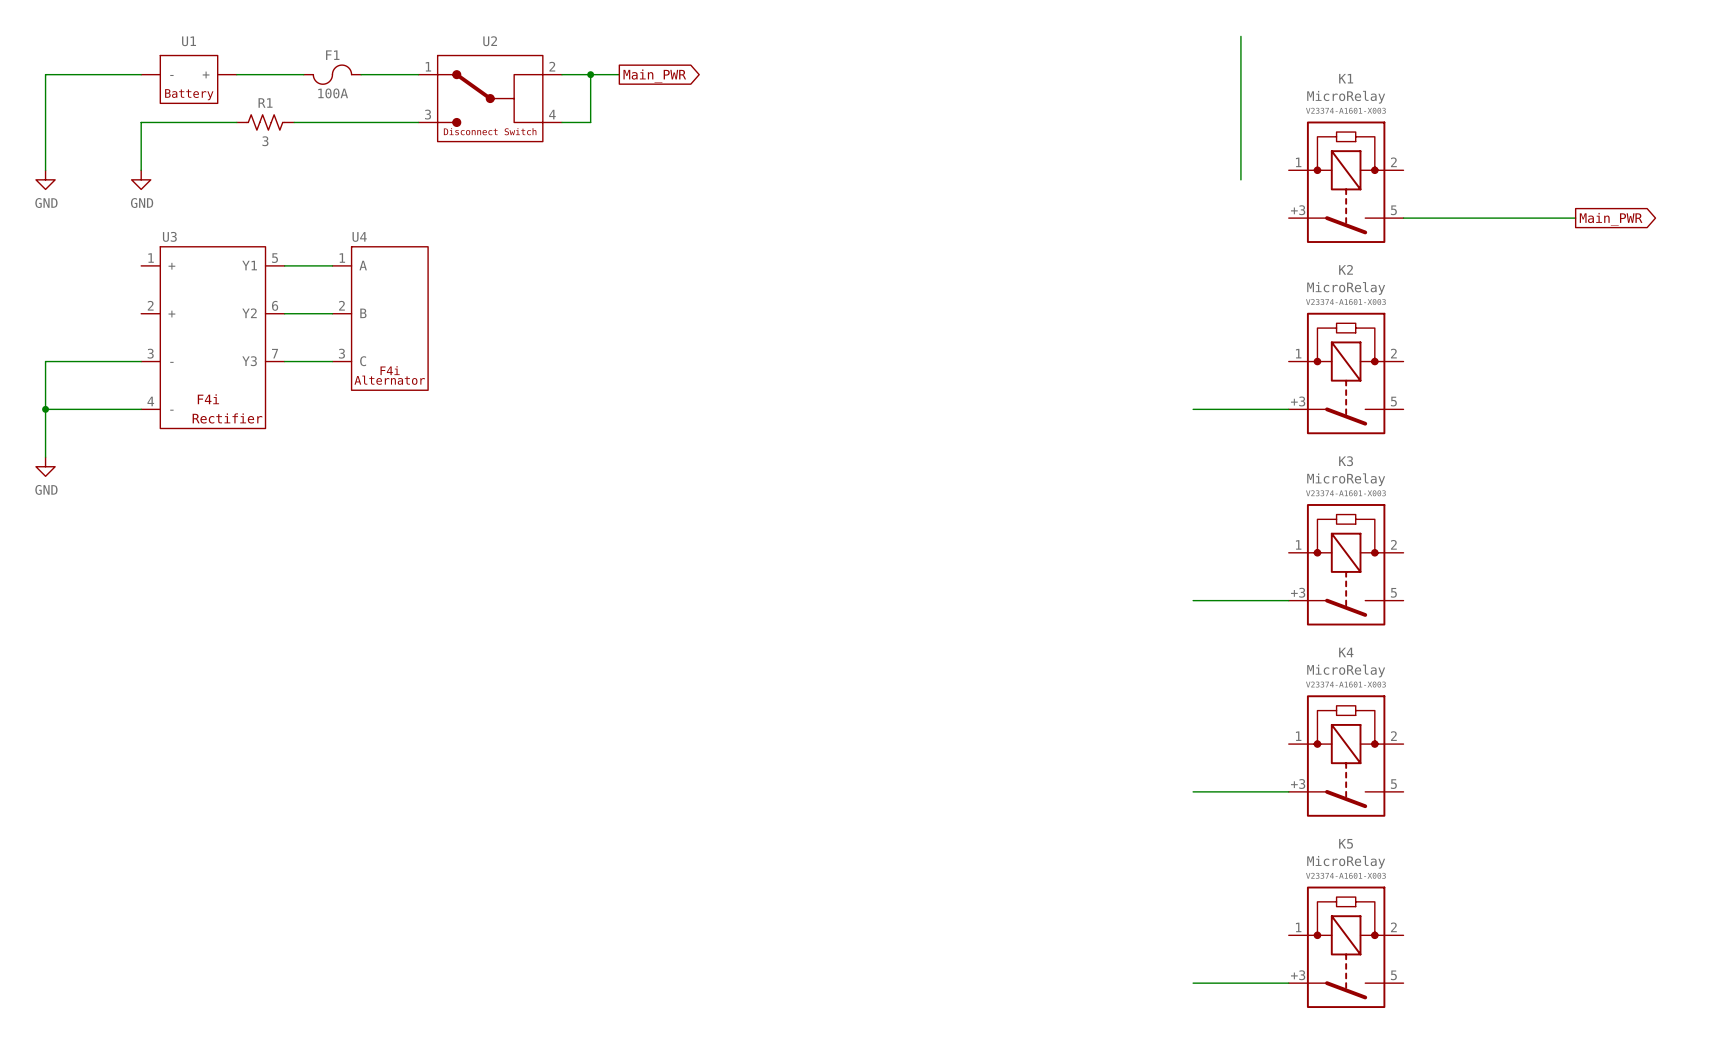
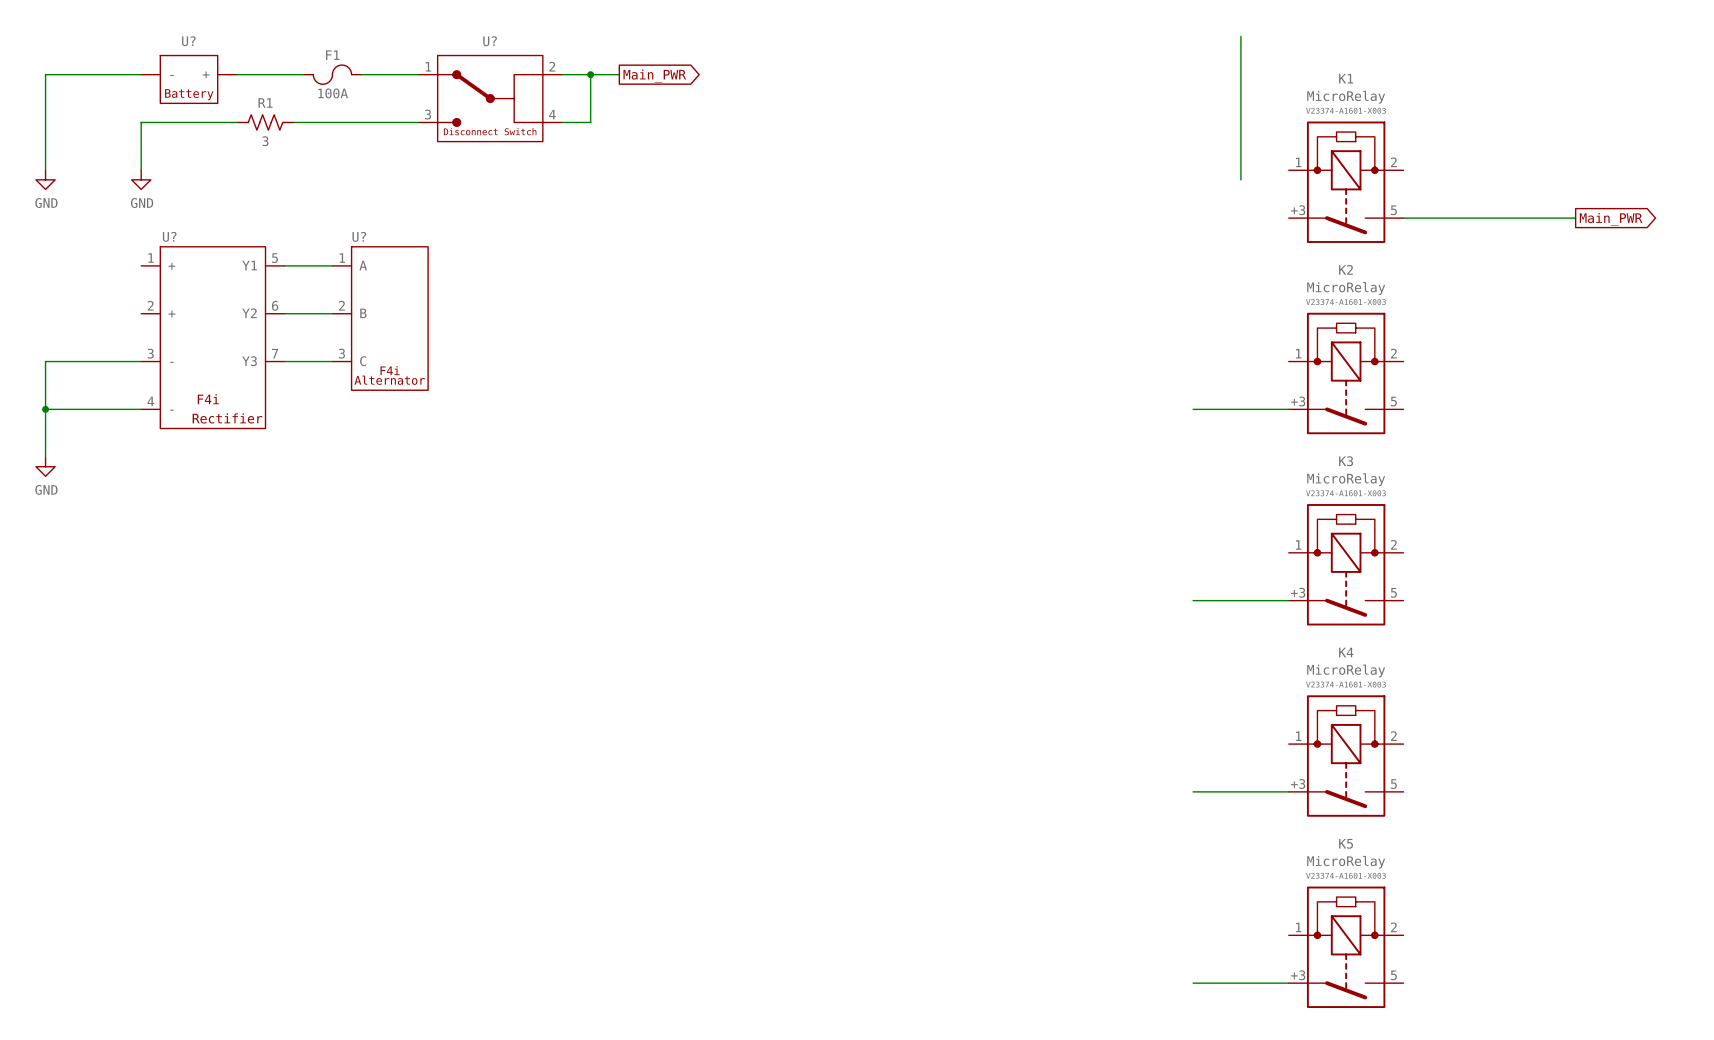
U1 name: U1 (189, 41) -> U? (188, 41)
U2 name: U2 (490, 41) -> U? (490, 41)
U3 name: U3 (169, 236) -> U? (169, 236)
U4 name: U4 (359, 236) -> U? (359, 236)

